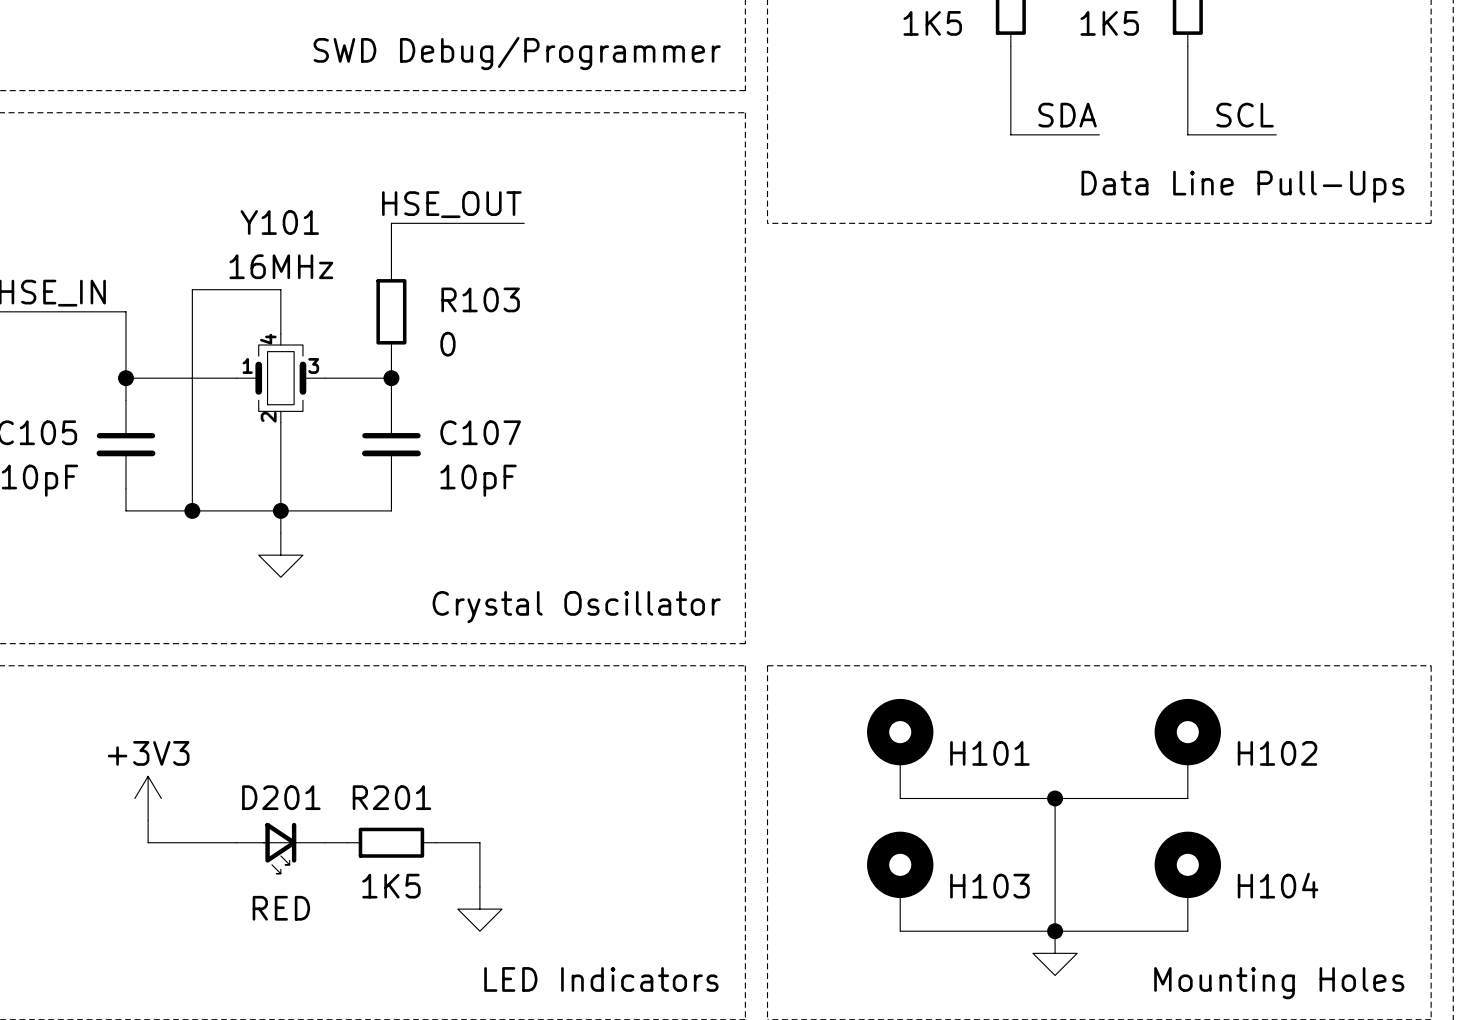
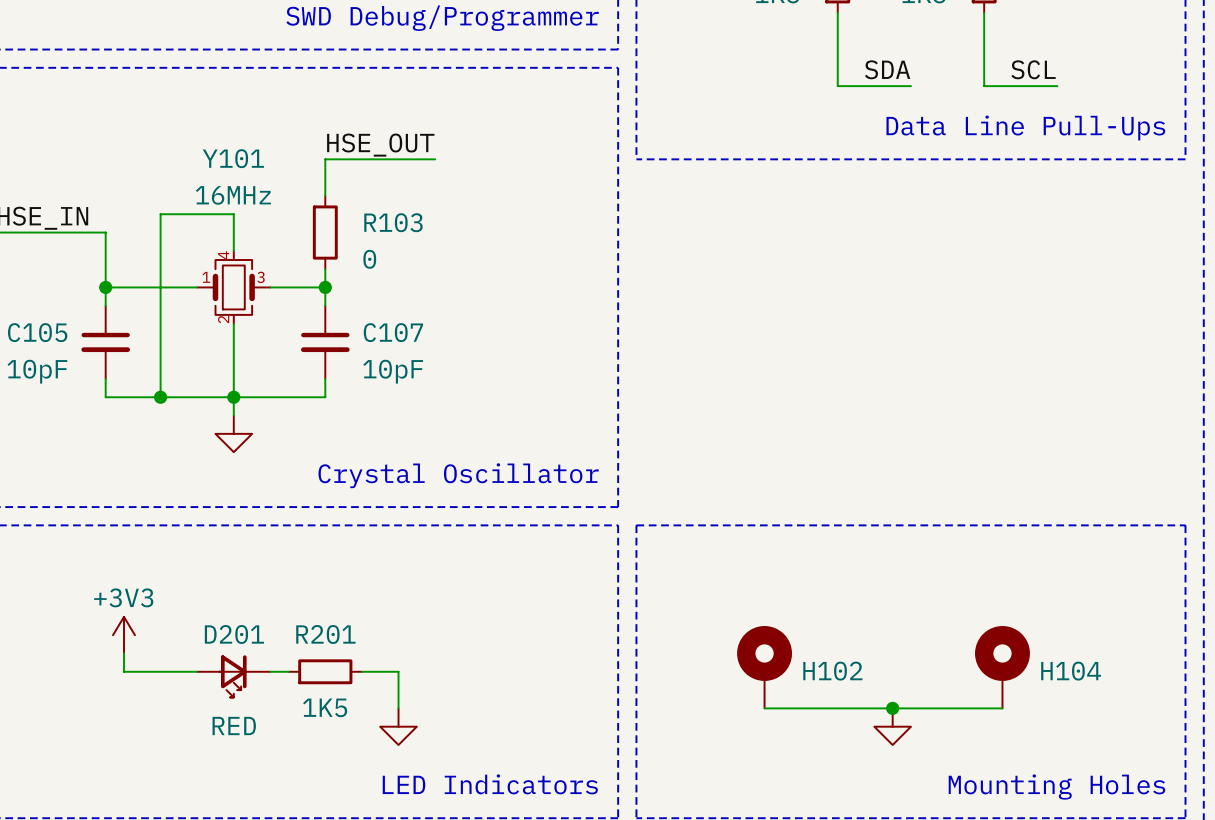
H101: (900, 748) -> none
H102 position: (1187, 748) -> (764, 667)
wire: (900, 798) (1187, 798) -> none
wire: (1055, 798) (1055, 931) -> none
junction: (1055, 798) -> none
H103: (900, 881) -> none
H104 position: (1187, 881) -> (1002, 667)
junction: none -> (892, 708)
wire: (900, 931) (1187, 931) -> (764, 708) (1002, 708)
junction: (1055, 931) -> none
power symbol position: (1055, 953) -> (892, 726)

